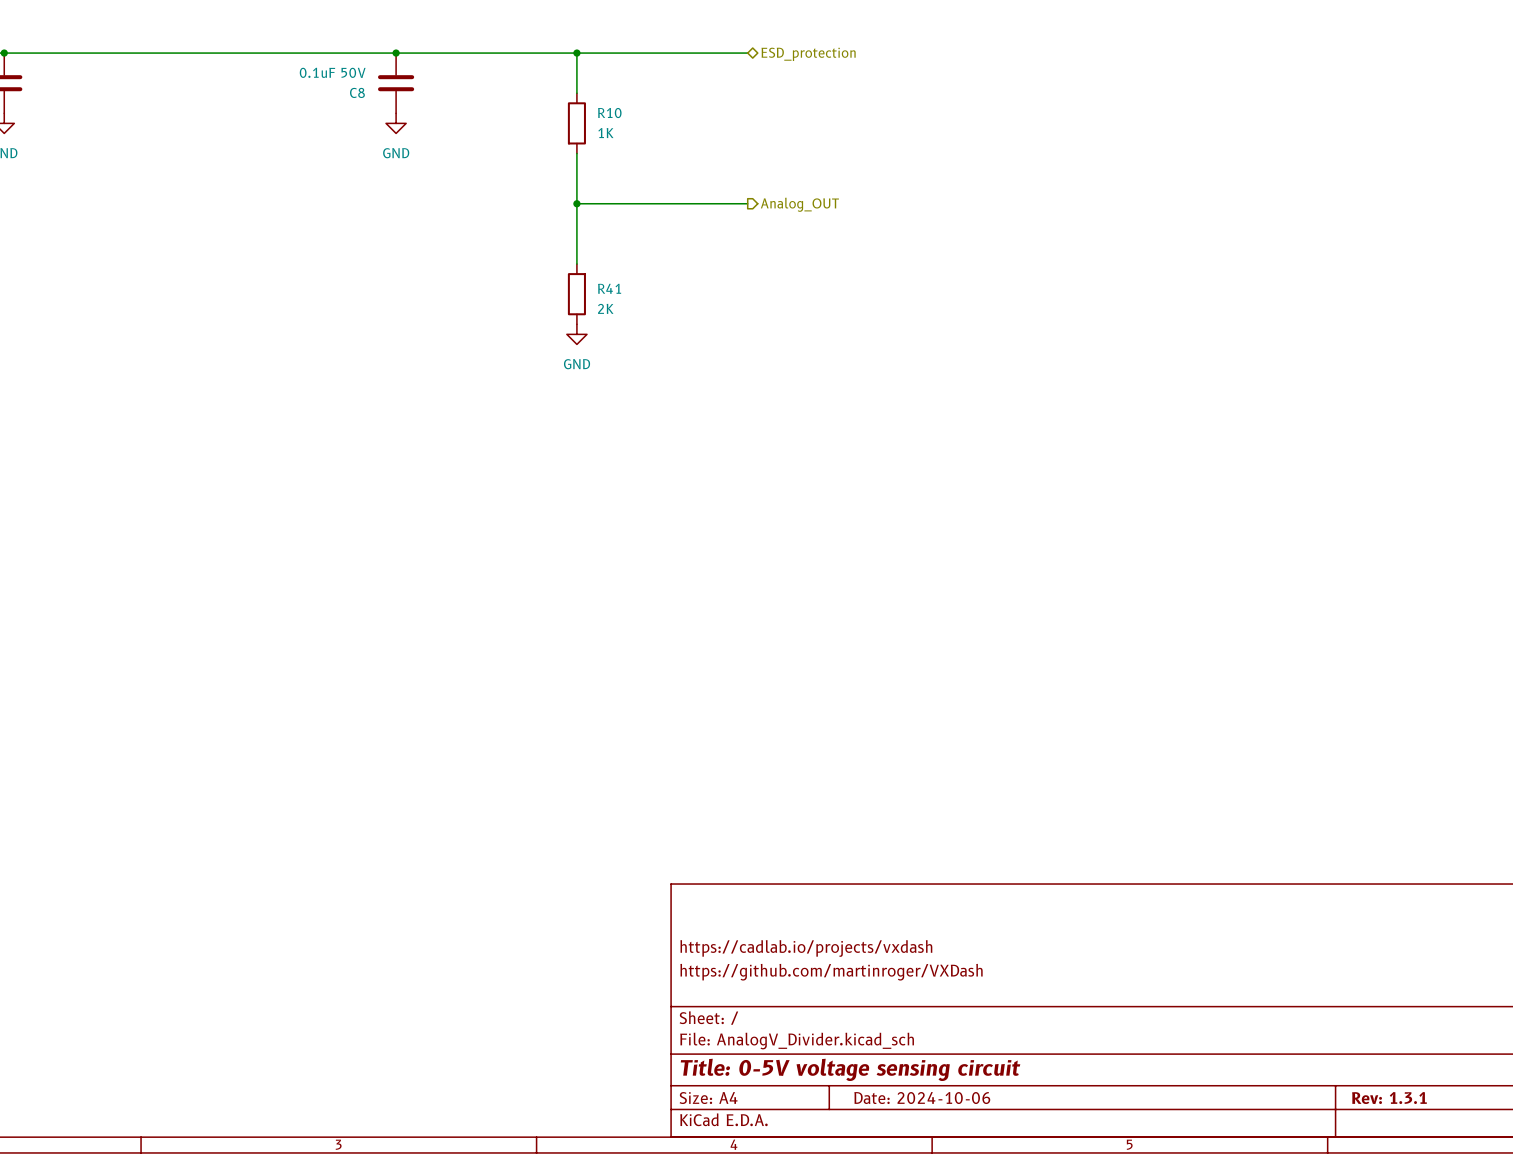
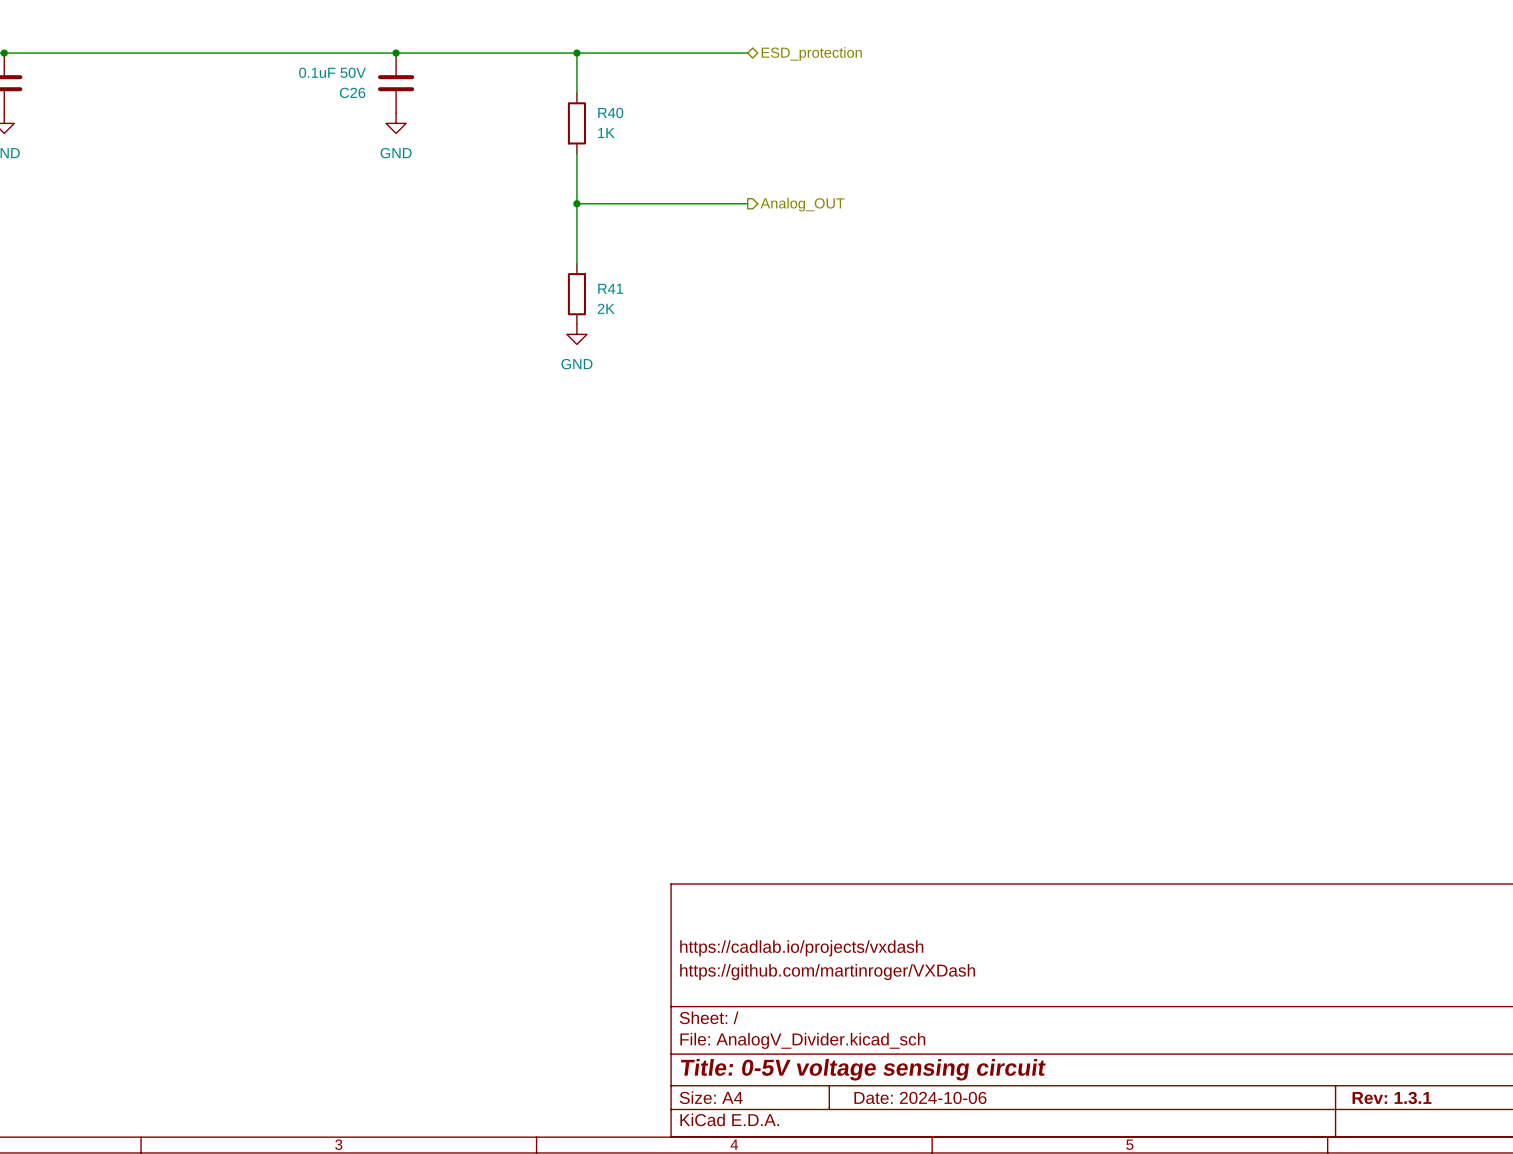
C8 name: C8 (357, 92) -> C26 (352, 92)
R10 name: R10 (609, 113) -> R40 (610, 112)

